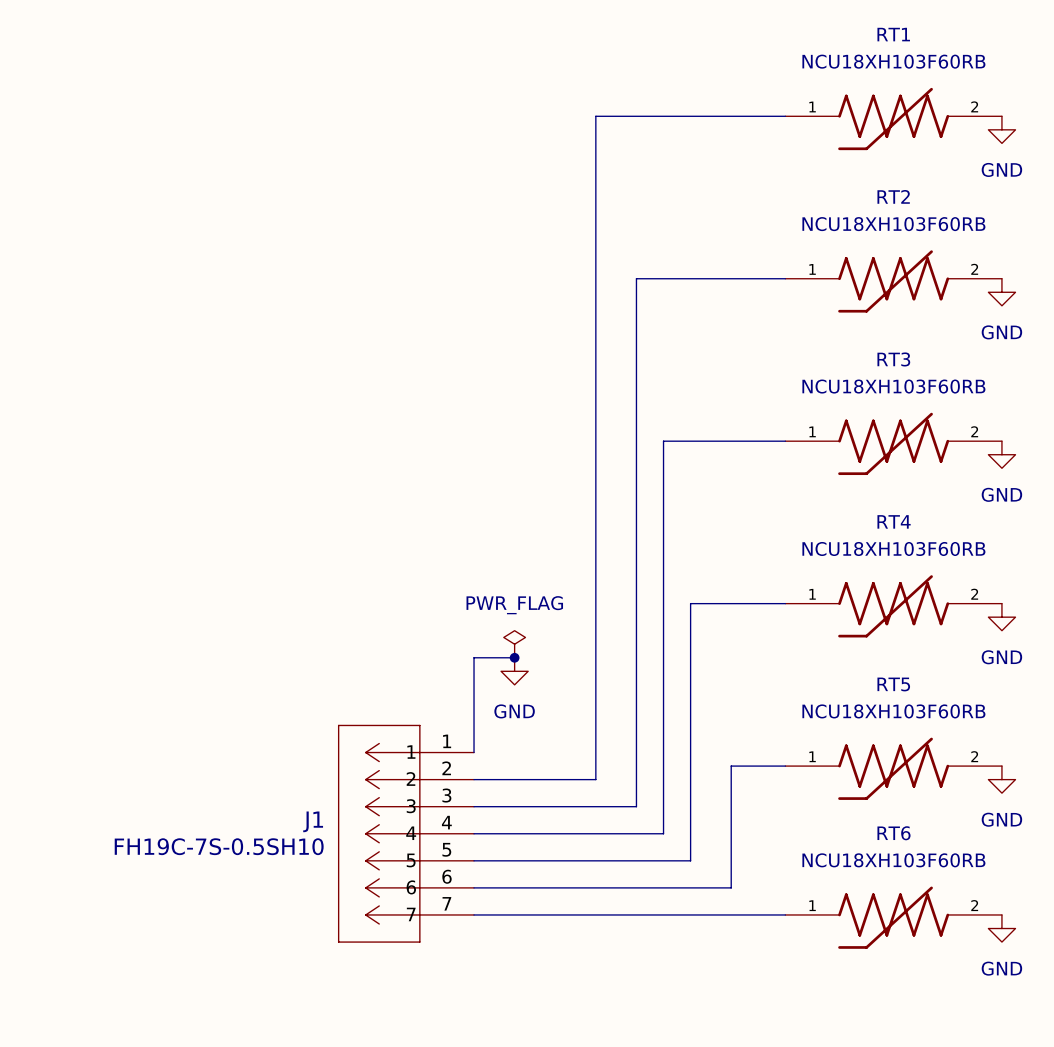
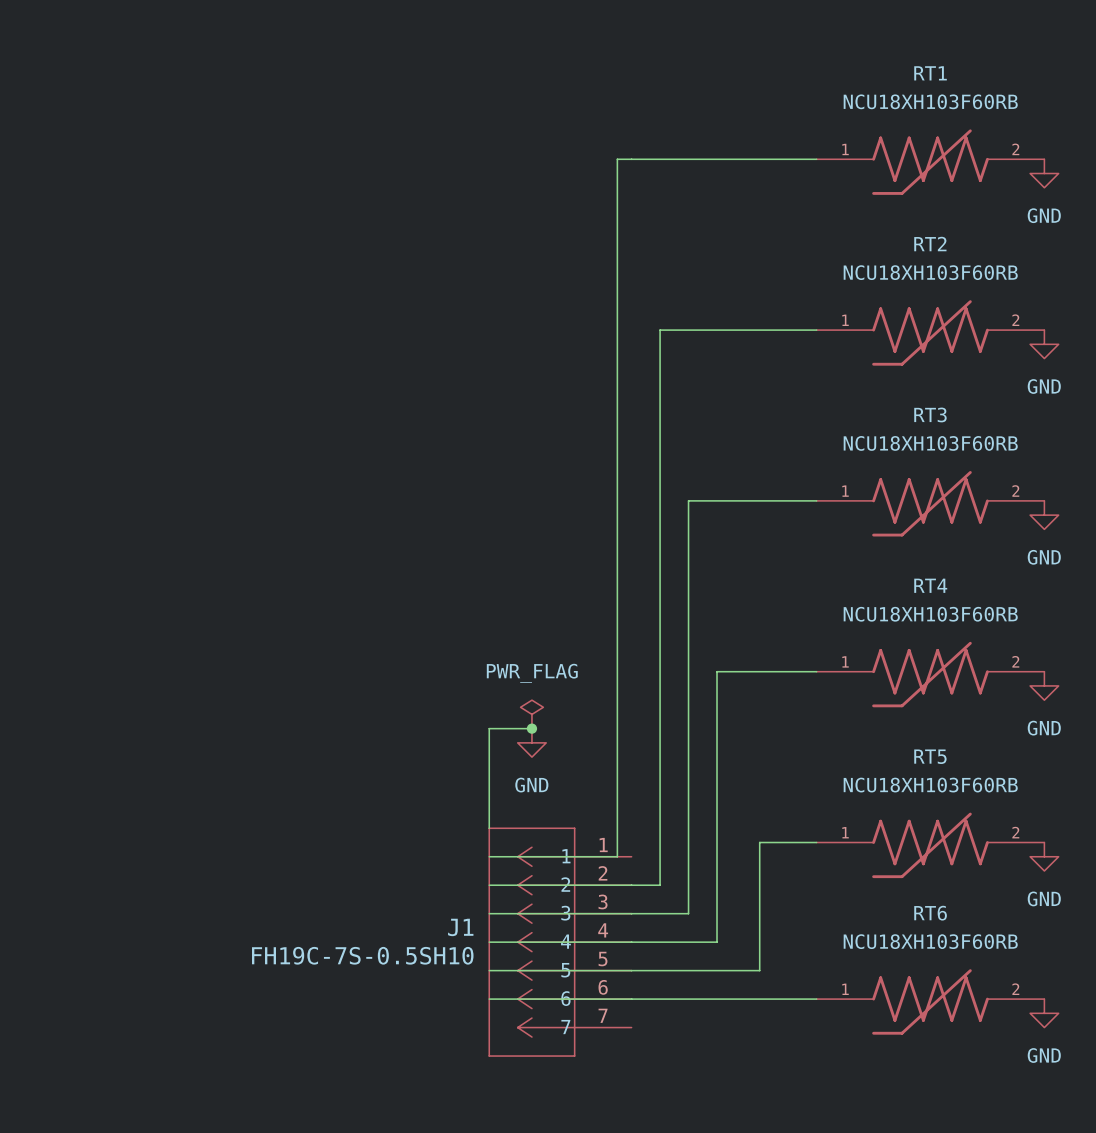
J1 position: (405, 833) -> (560, 942)

